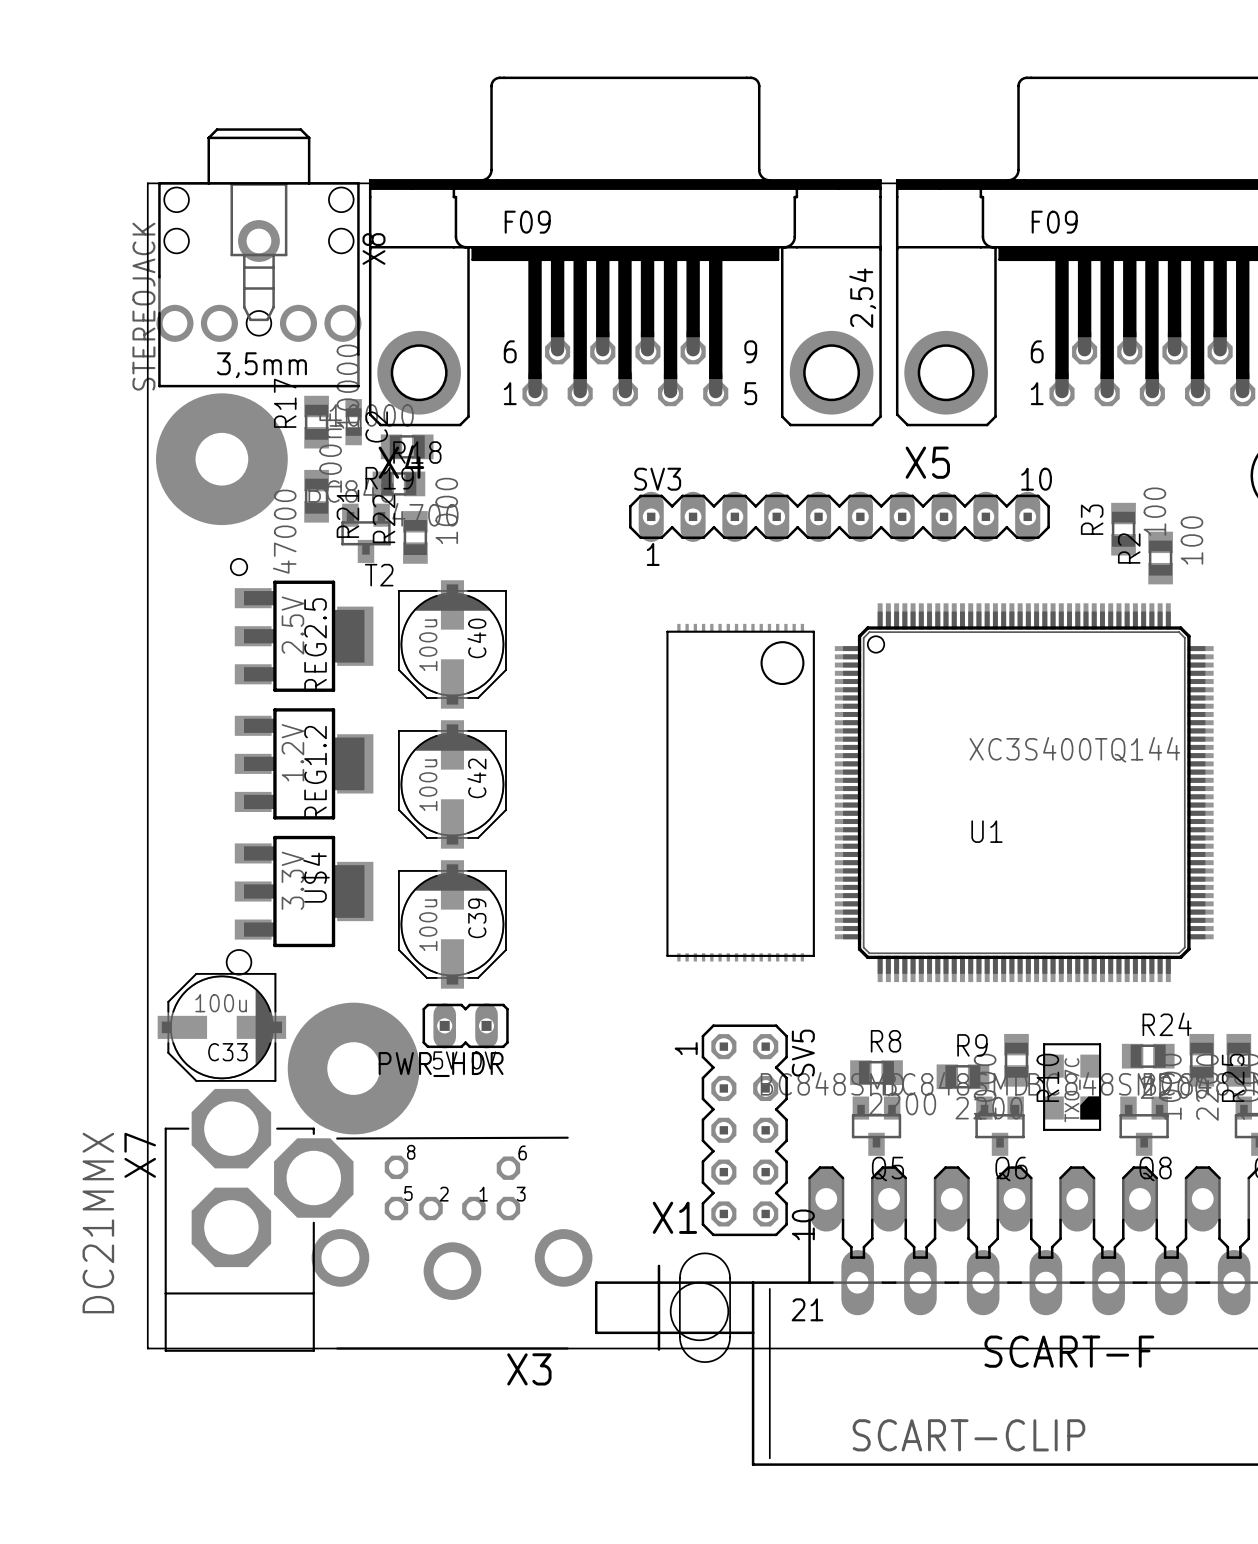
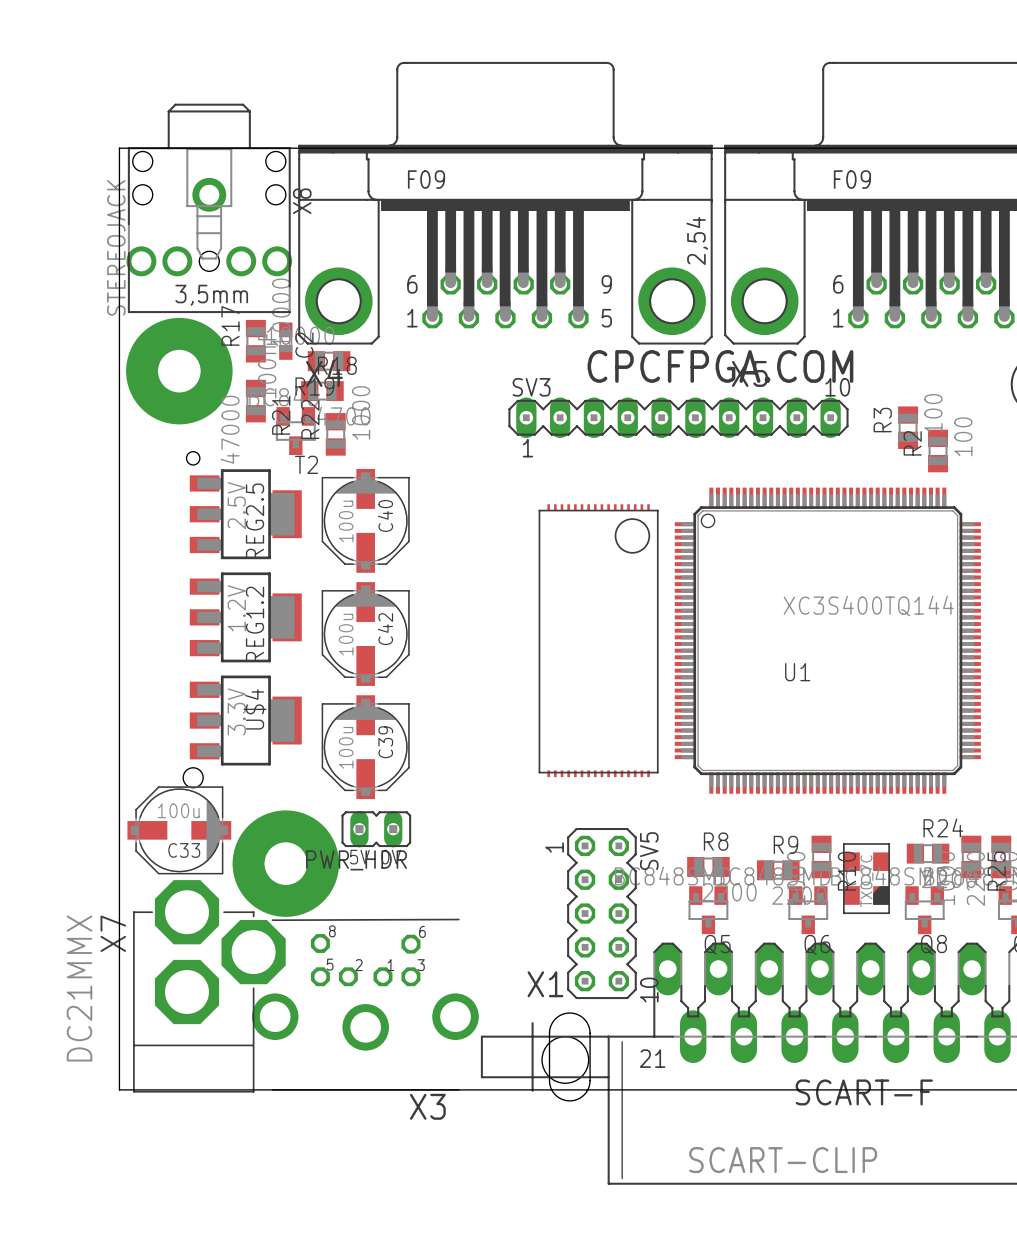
text: none -> CPCFPGA.COM (720, 366)

